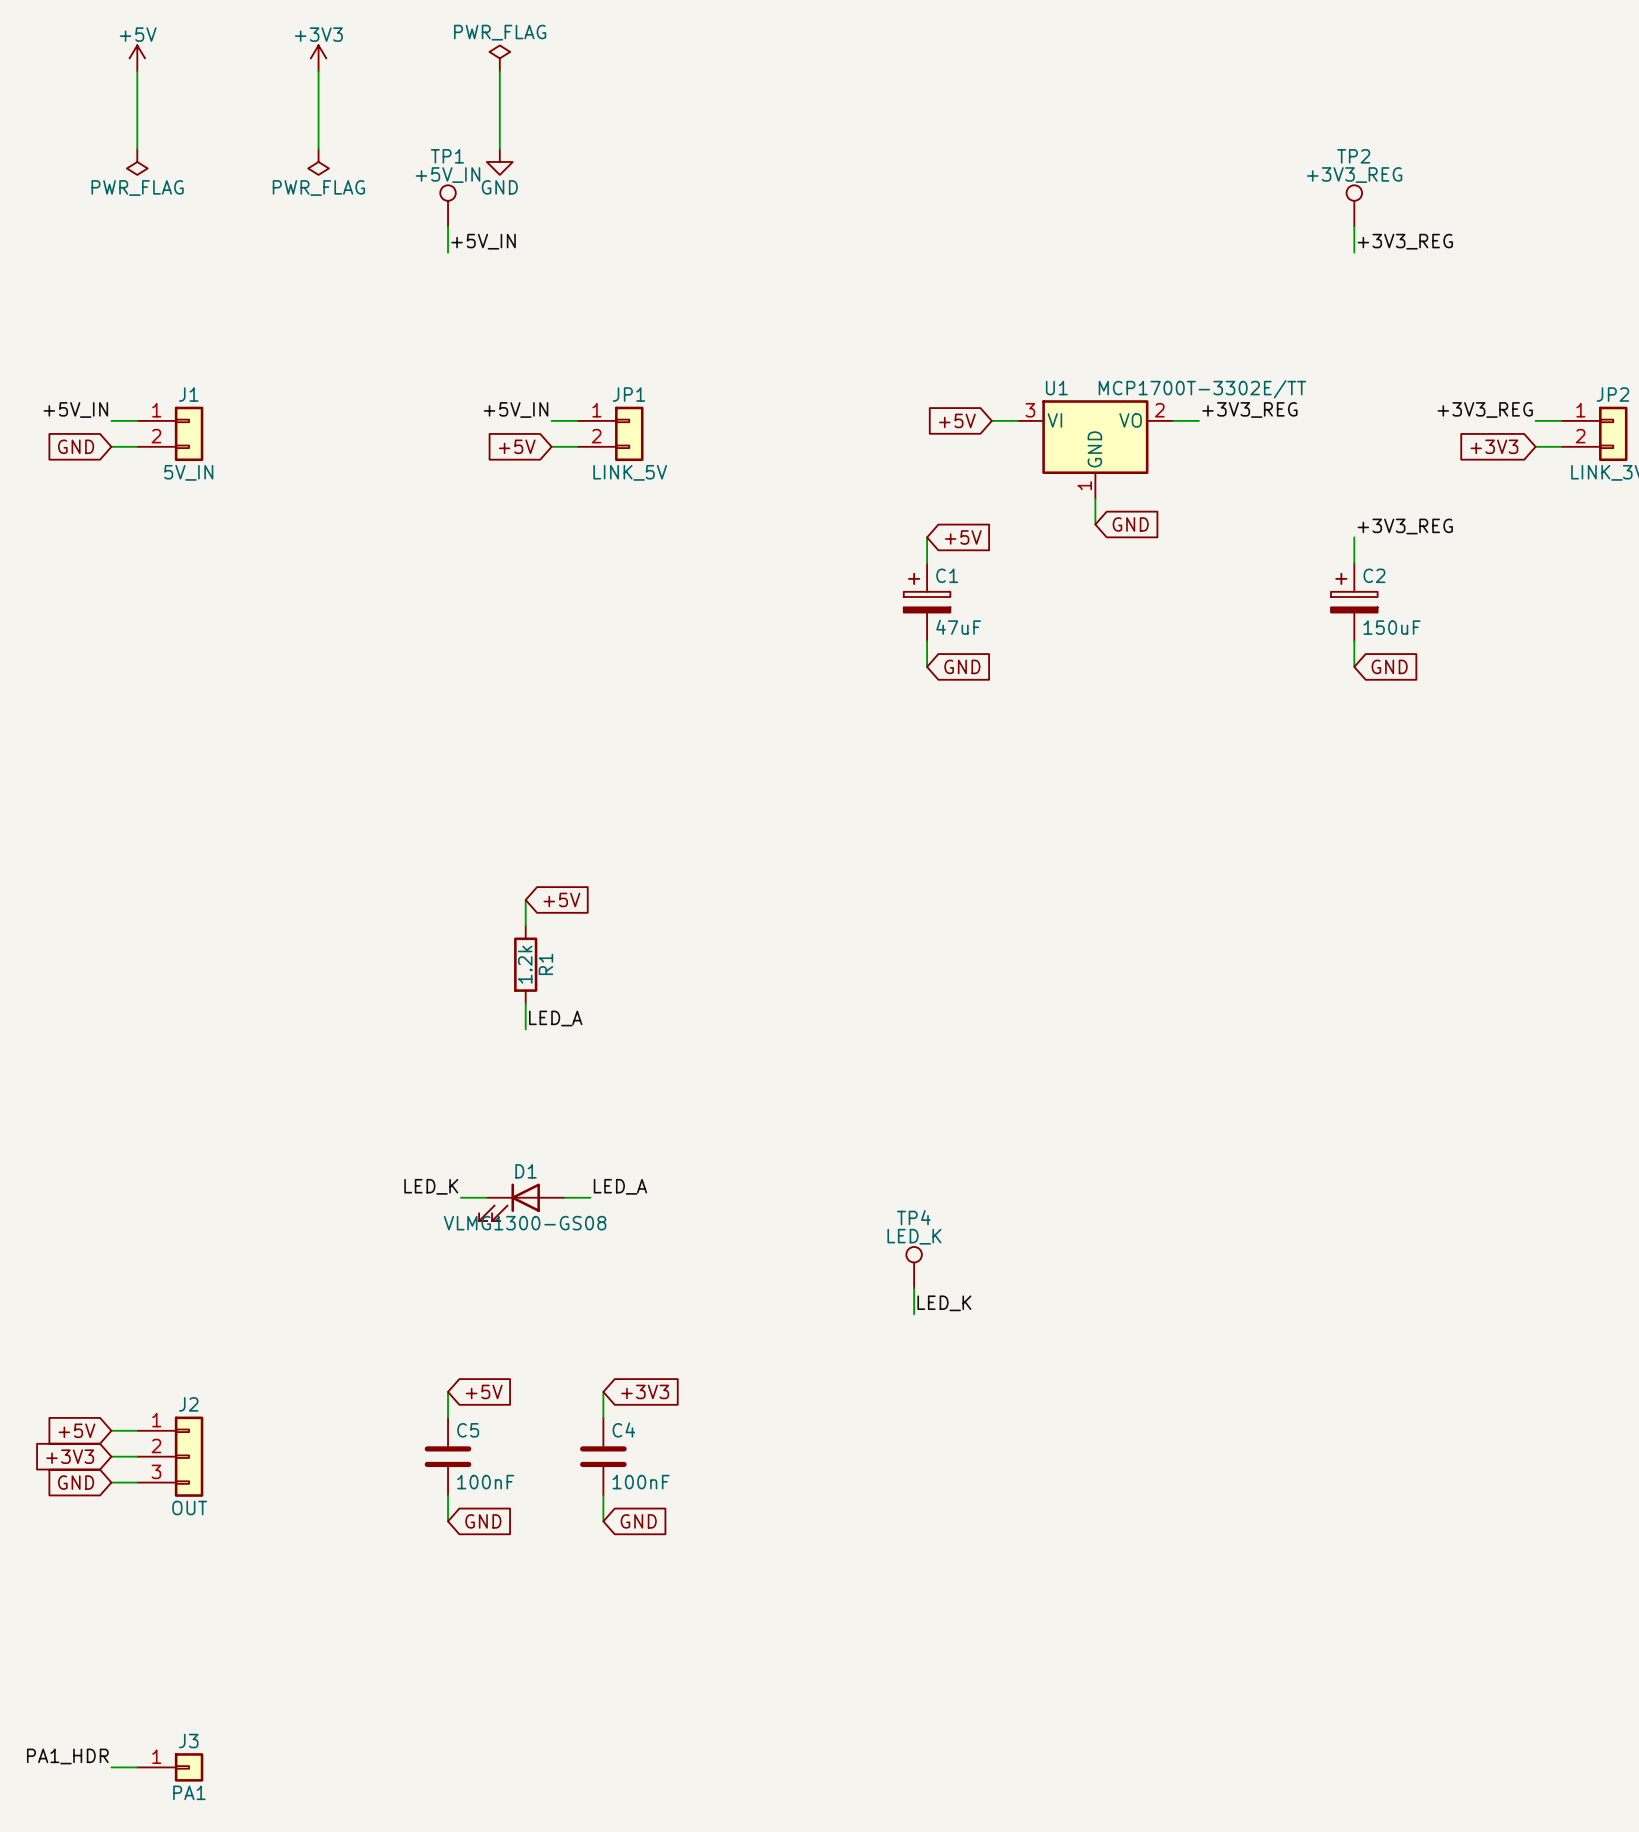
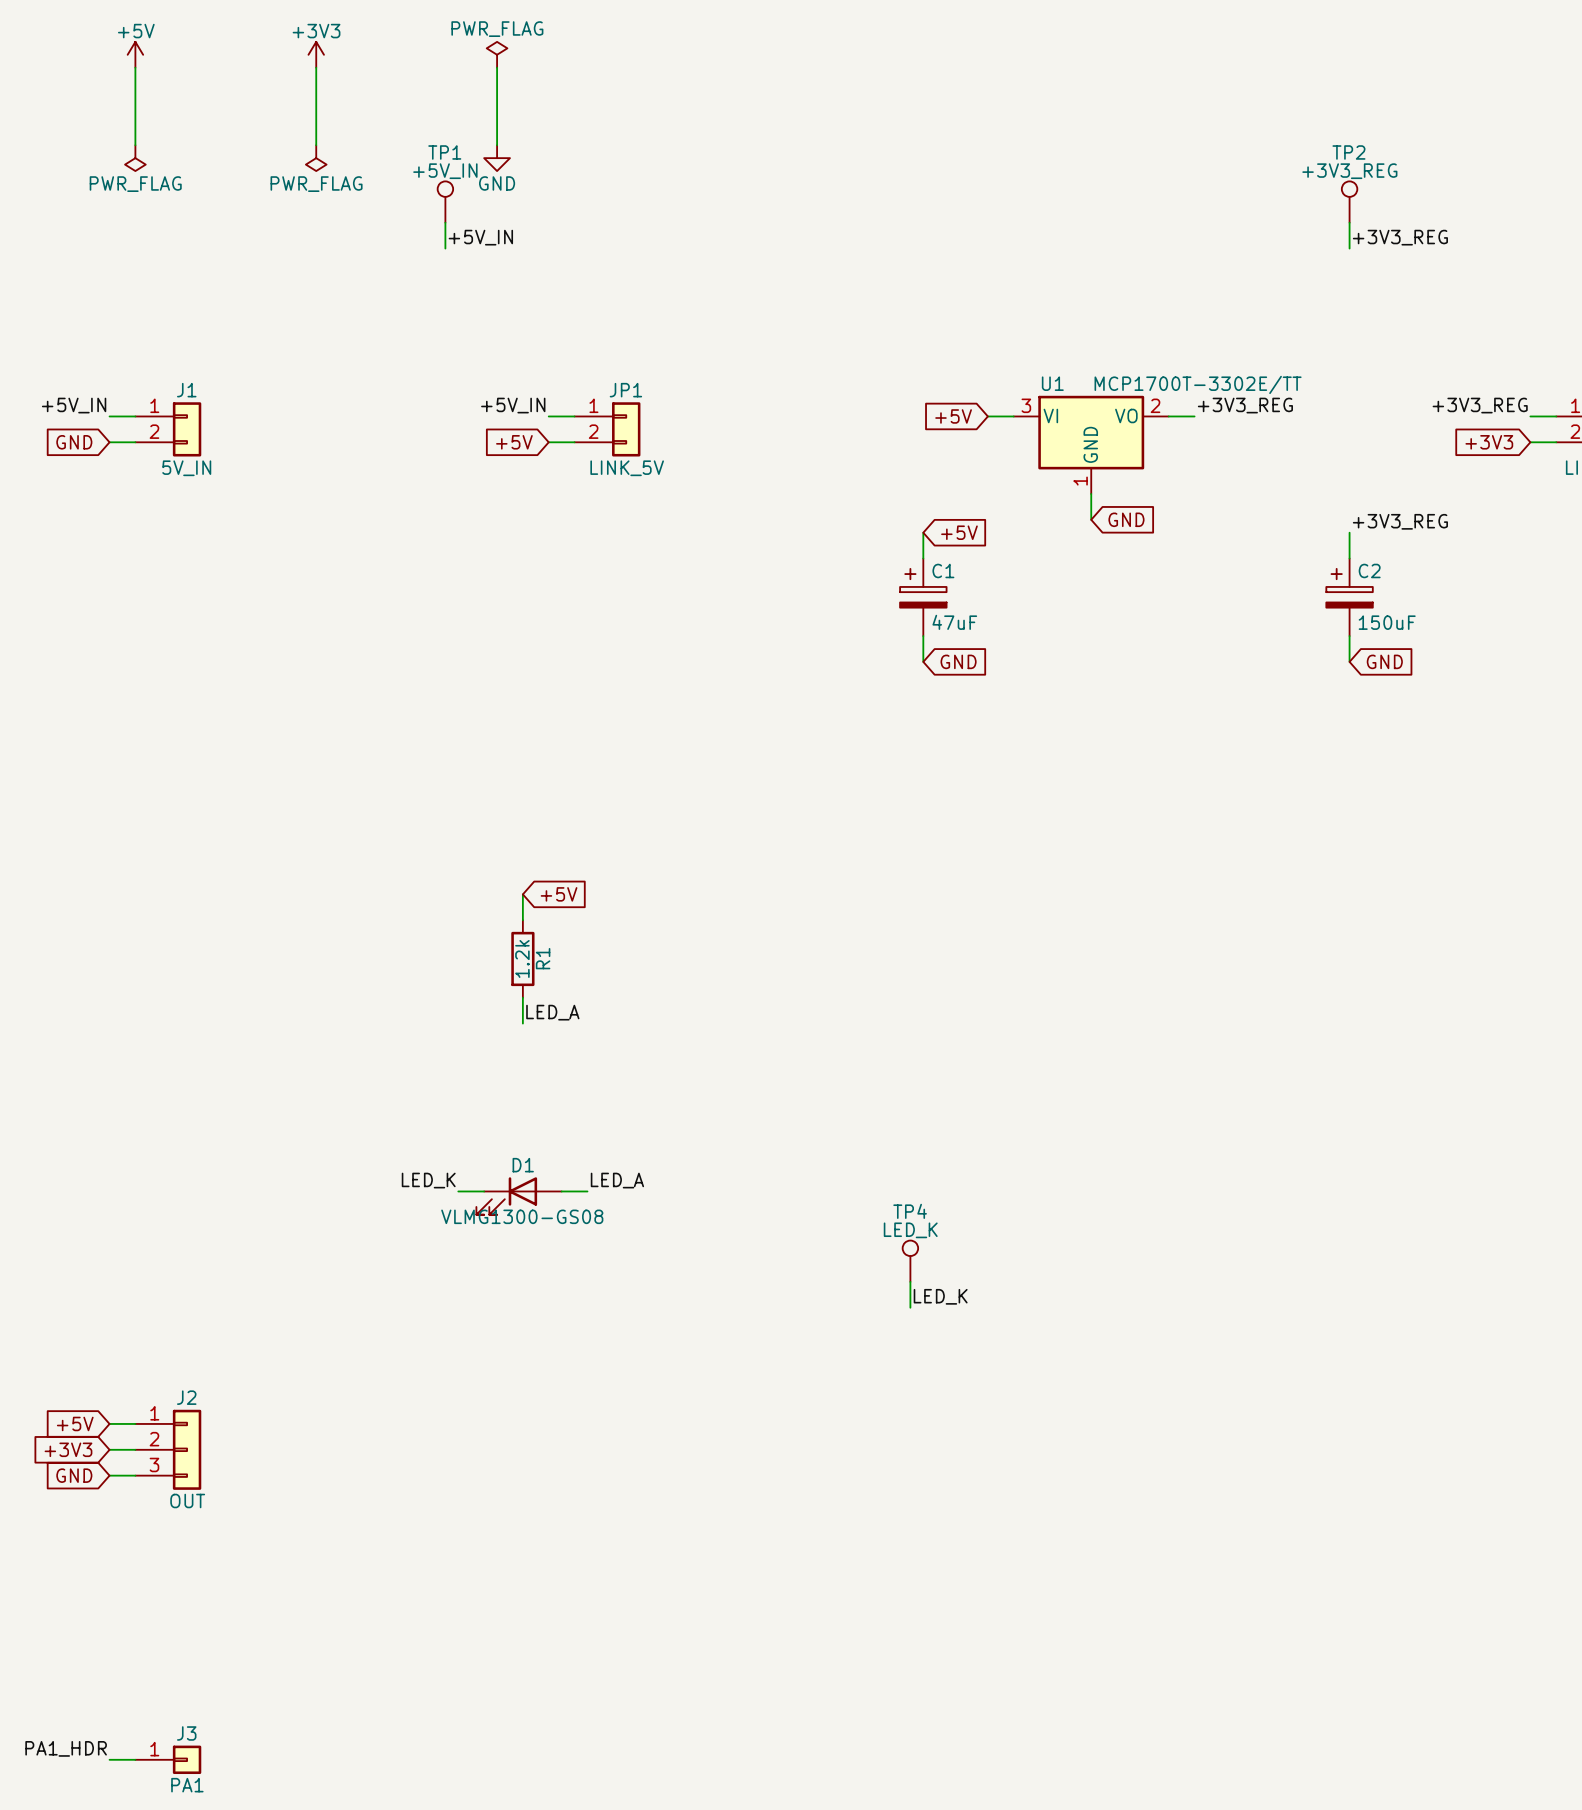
wire: (448, 1391) (448, 1417) -> none
global label: +5V (484, 1391) -> none
wire: (603, 1391) (603, 1417) -> none
global label: +3V3 (645, 1391) -> none
C5: 100nF (448, 1456) -> none
C4: 100nF (603, 1456) -> none
wire: (448, 1495) (448, 1521) -> none
wire: (603, 1495) (603, 1521) -> none
global label: GND (483, 1521) -> none
global label: GND (638, 1521) -> none

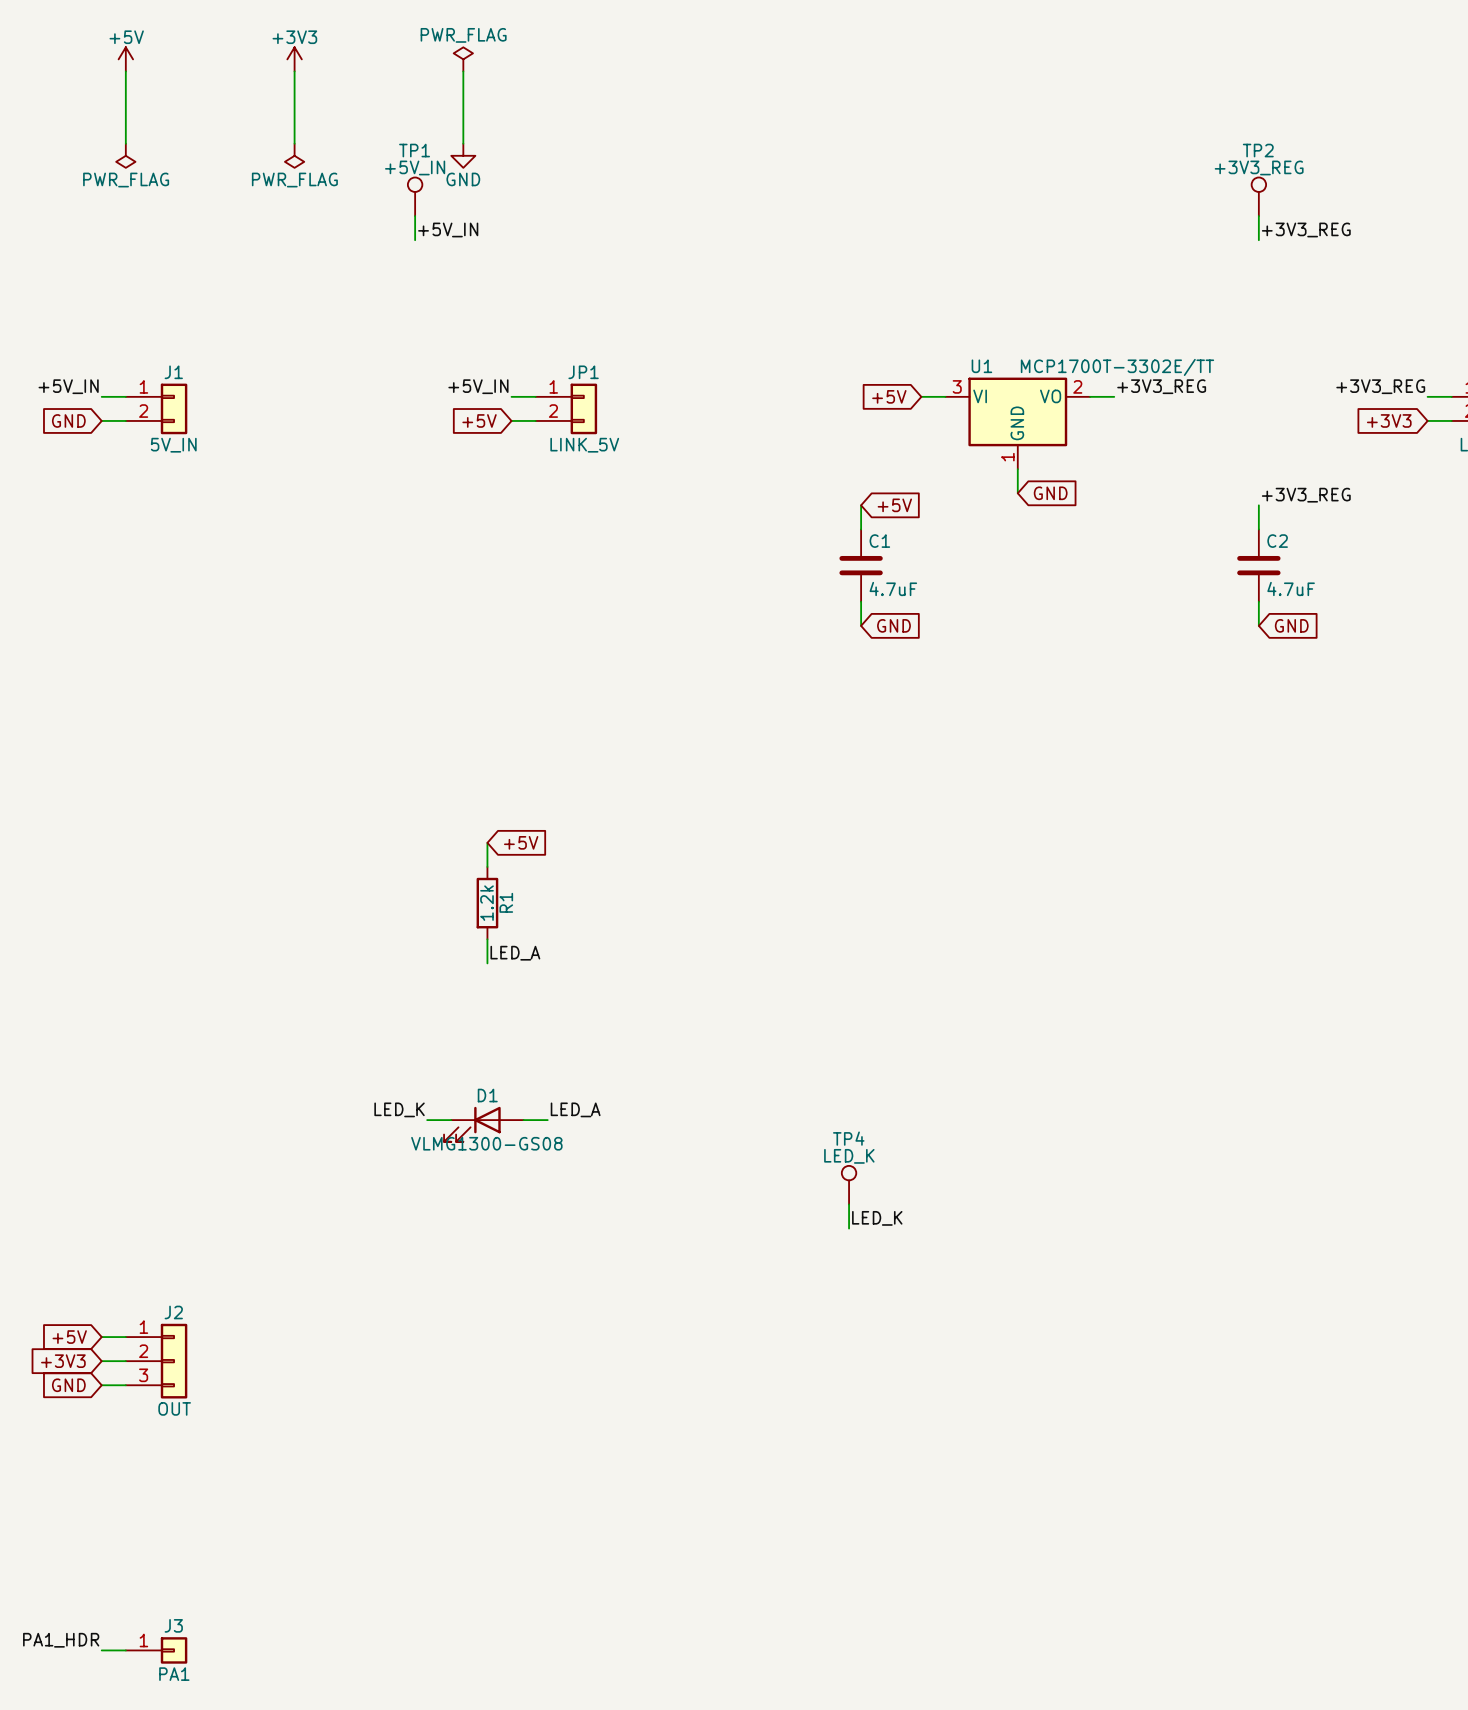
C1 symbol: [900, 558, 947, 637] -> [839, 529, 883, 602]
C2 symbol: [1326, 558, 1373, 637] -> [1237, 529, 1281, 602]
C1 value: 47uF (954, 622) -> 4.7uF (893, 588)
C2 value: 150uF (1387, 622) -> 4.7uF (1291, 588)

